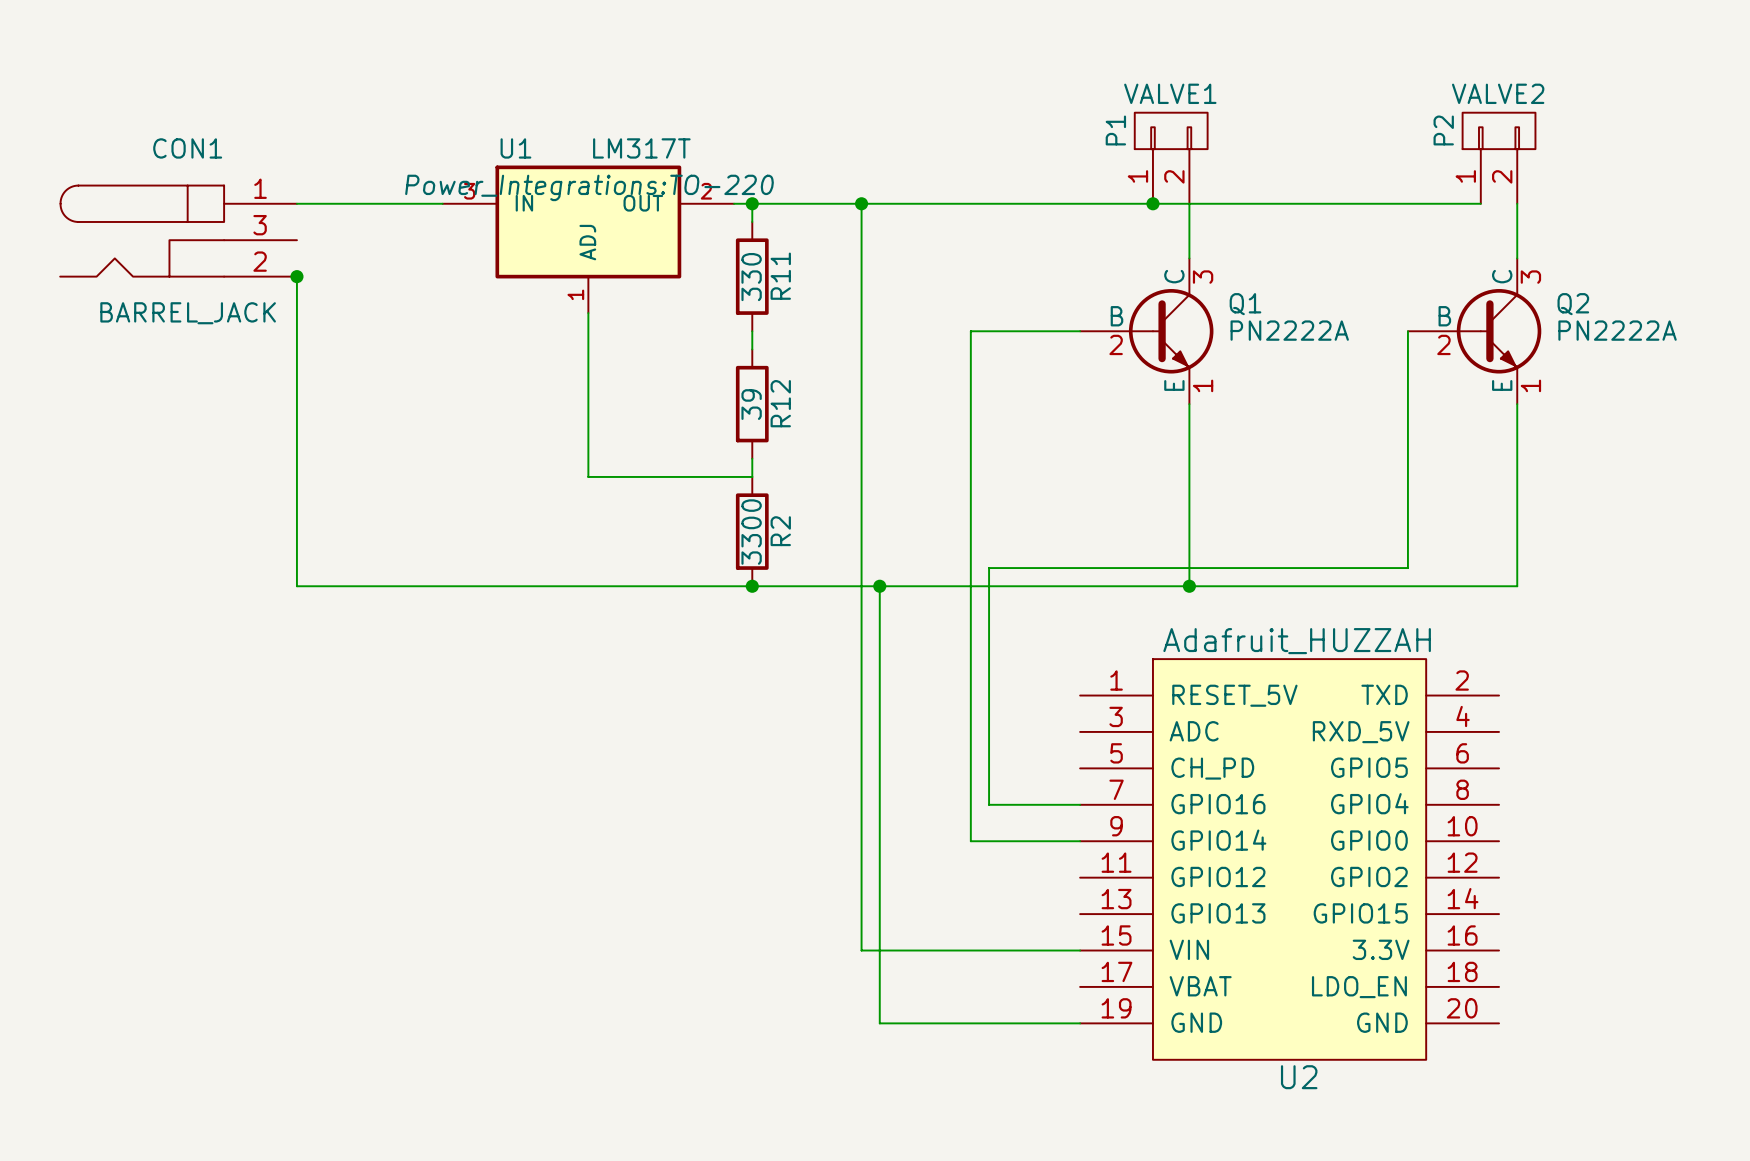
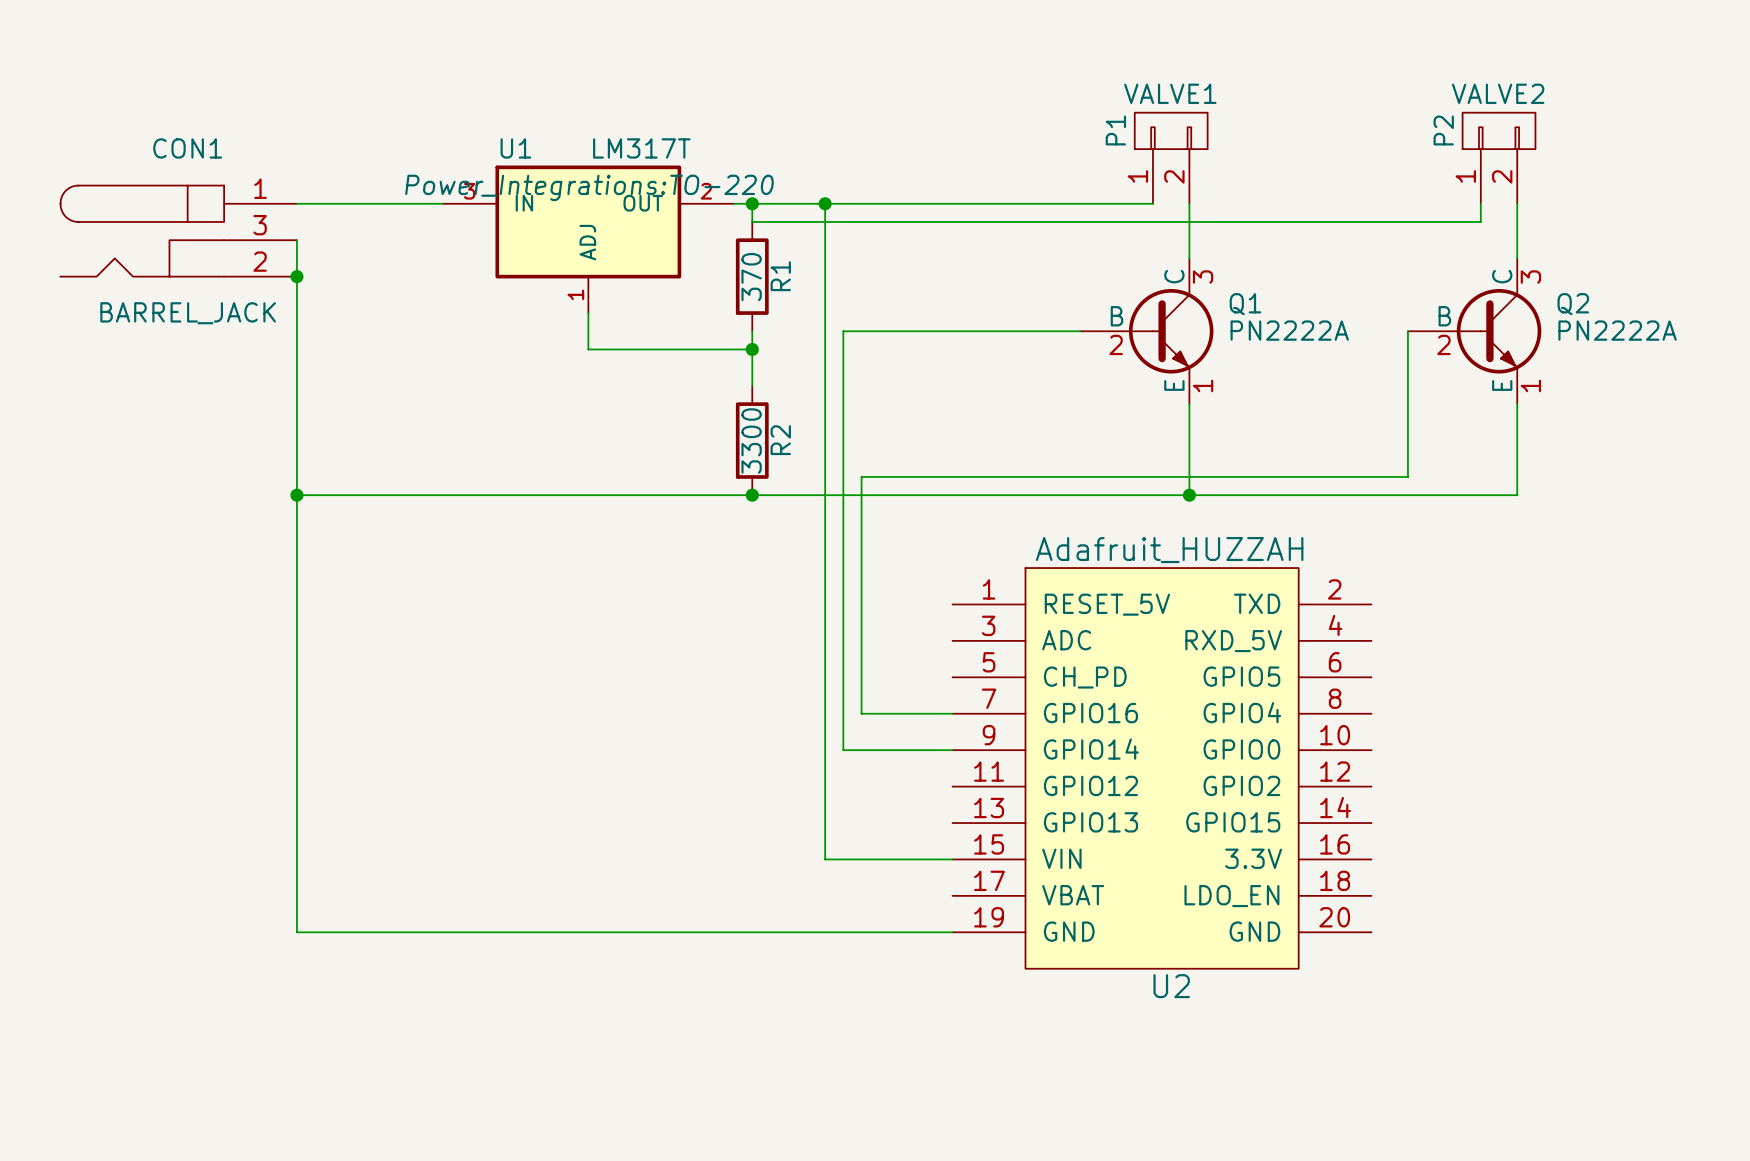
wire: none -> (825, 203) (825, 859) (952, 859)
wire: (861, 203) (861, 476) -> none
junction position: (861, 203) -> (825, 203)
wire: (1152, 203) (1480, 203) -> (752, 221) (1480, 221) (1480, 203)
junction: (1152, 203) -> none
wire: none -> (296, 240) (296, 276)
R11 name: R11 (780, 276) -> R1 (780, 276)
R11 value: 330 (751, 277) -> 370 (751, 277)
wire: (970, 331) (970, 841) (1080, 841) -> (970, 331) (843, 331) (843, 750) (952, 750)
wire: (588, 349) (588, 476) (752, 476) (752, 458) -> (588, 349) (752, 349) (752, 385)
junction: none -> (752, 349)
R12: 39 (752, 404) -> none
wire: (1407, 476) (1407, 568) (989, 568) (989, 804) (1080, 804) -> (1407, 476) (861, 476)
junction: none -> (296, 495)
junction: none -> (752, 495)
wire: (1189, 495) (1189, 586) -> none
junction: none -> (1189, 495)
wire: (1517, 495) (1517, 586) (296, 586) -> (1517, 495) (296, 495)
R2 position: (752, 531) -> (752, 440)
wire: none -> (296, 586) (296, 932) (952, 932)
junction: (752, 586) -> none
wire: (879, 586) (879, 1023) (1080, 1023) -> none
junction: (879, 586) -> none
junction: (1189, 586) -> none
wire: (861, 713) (861, 950) (1080, 950) -> (861, 713) (952, 713)
U2 position: (1289, 859) -> (1162, 768)

